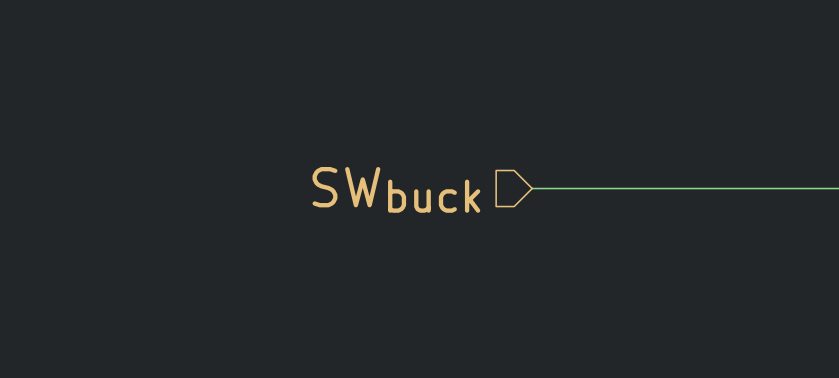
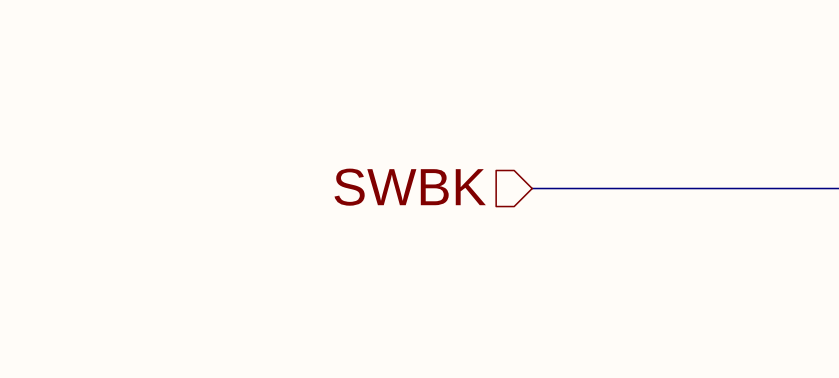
hierarchical label: SWbuck (396, 189) -> SWBK (410, 187)

